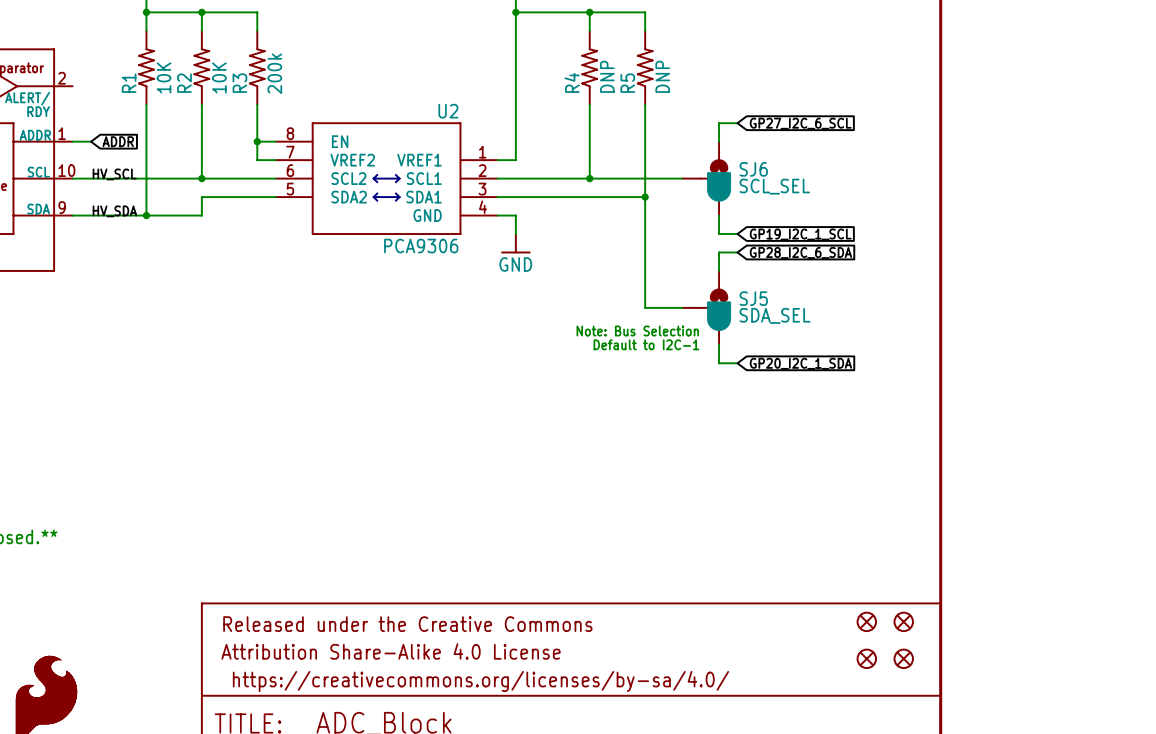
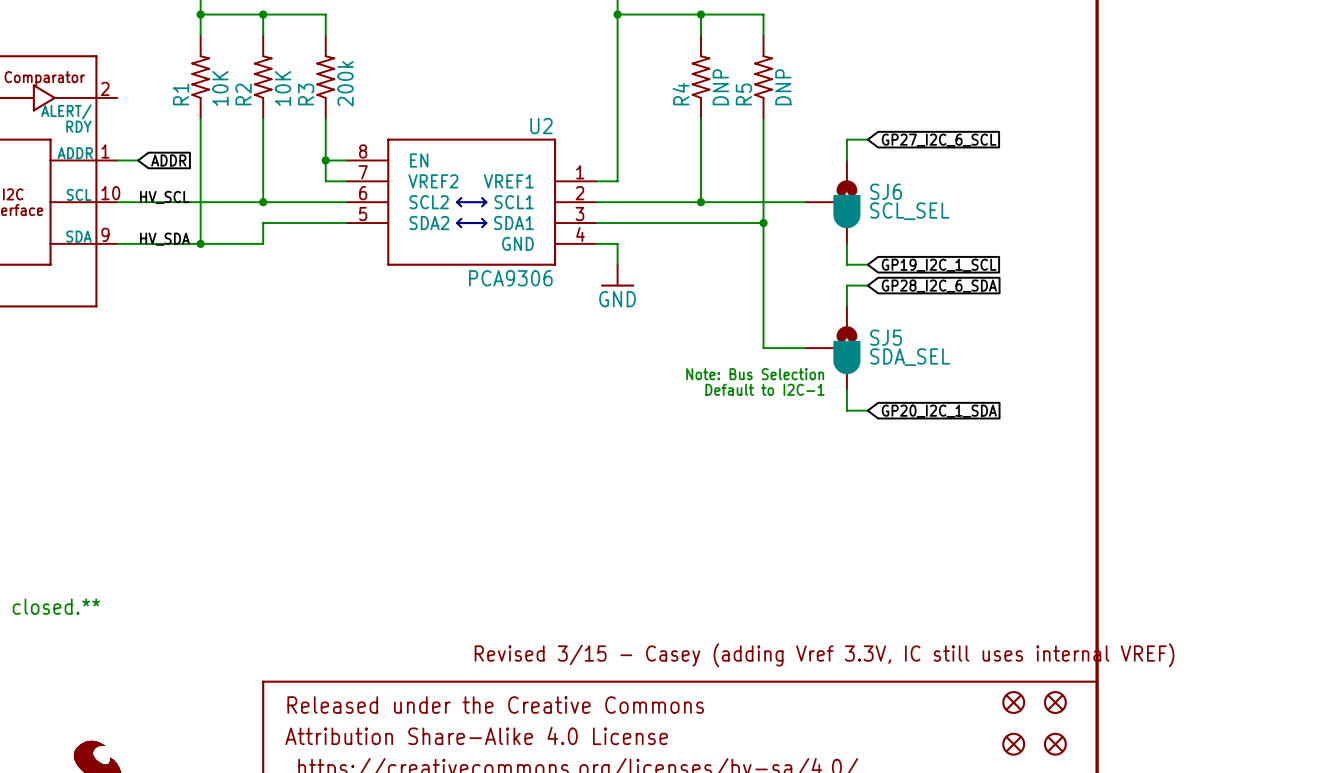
text: none -> Revised 3/15 - Casey (adding Vref 3.3V, IC still uses internal VREF) (824, 655)

